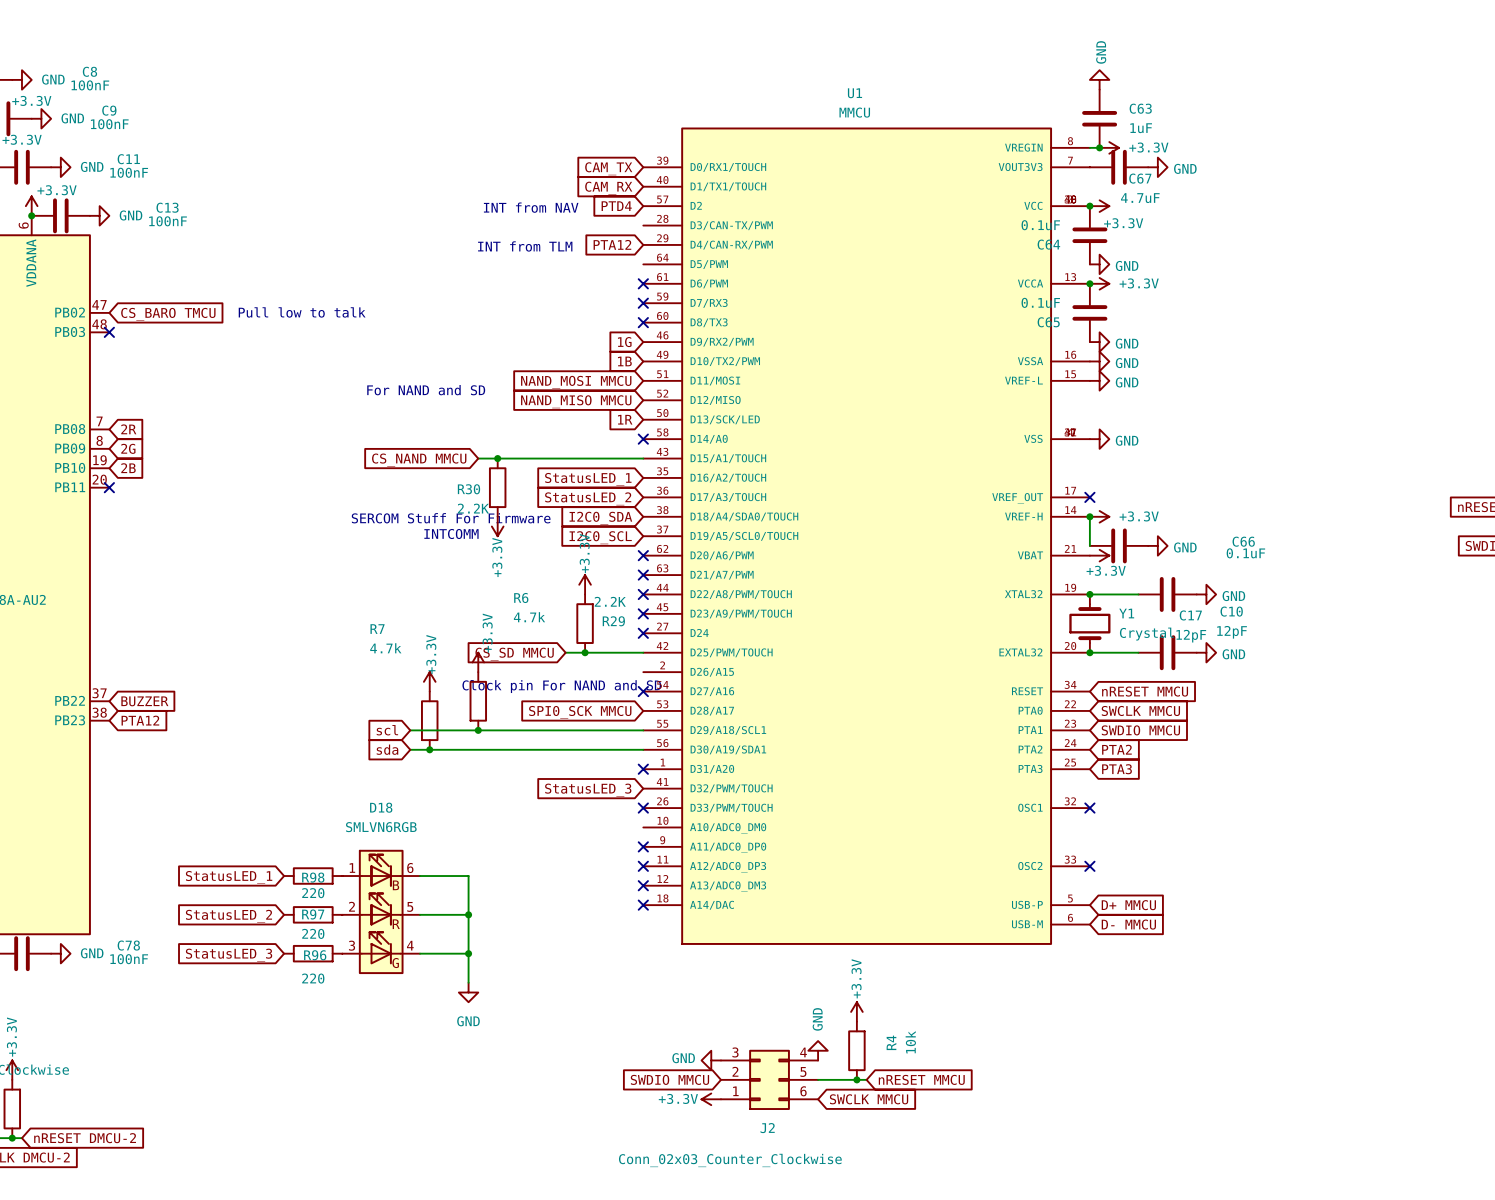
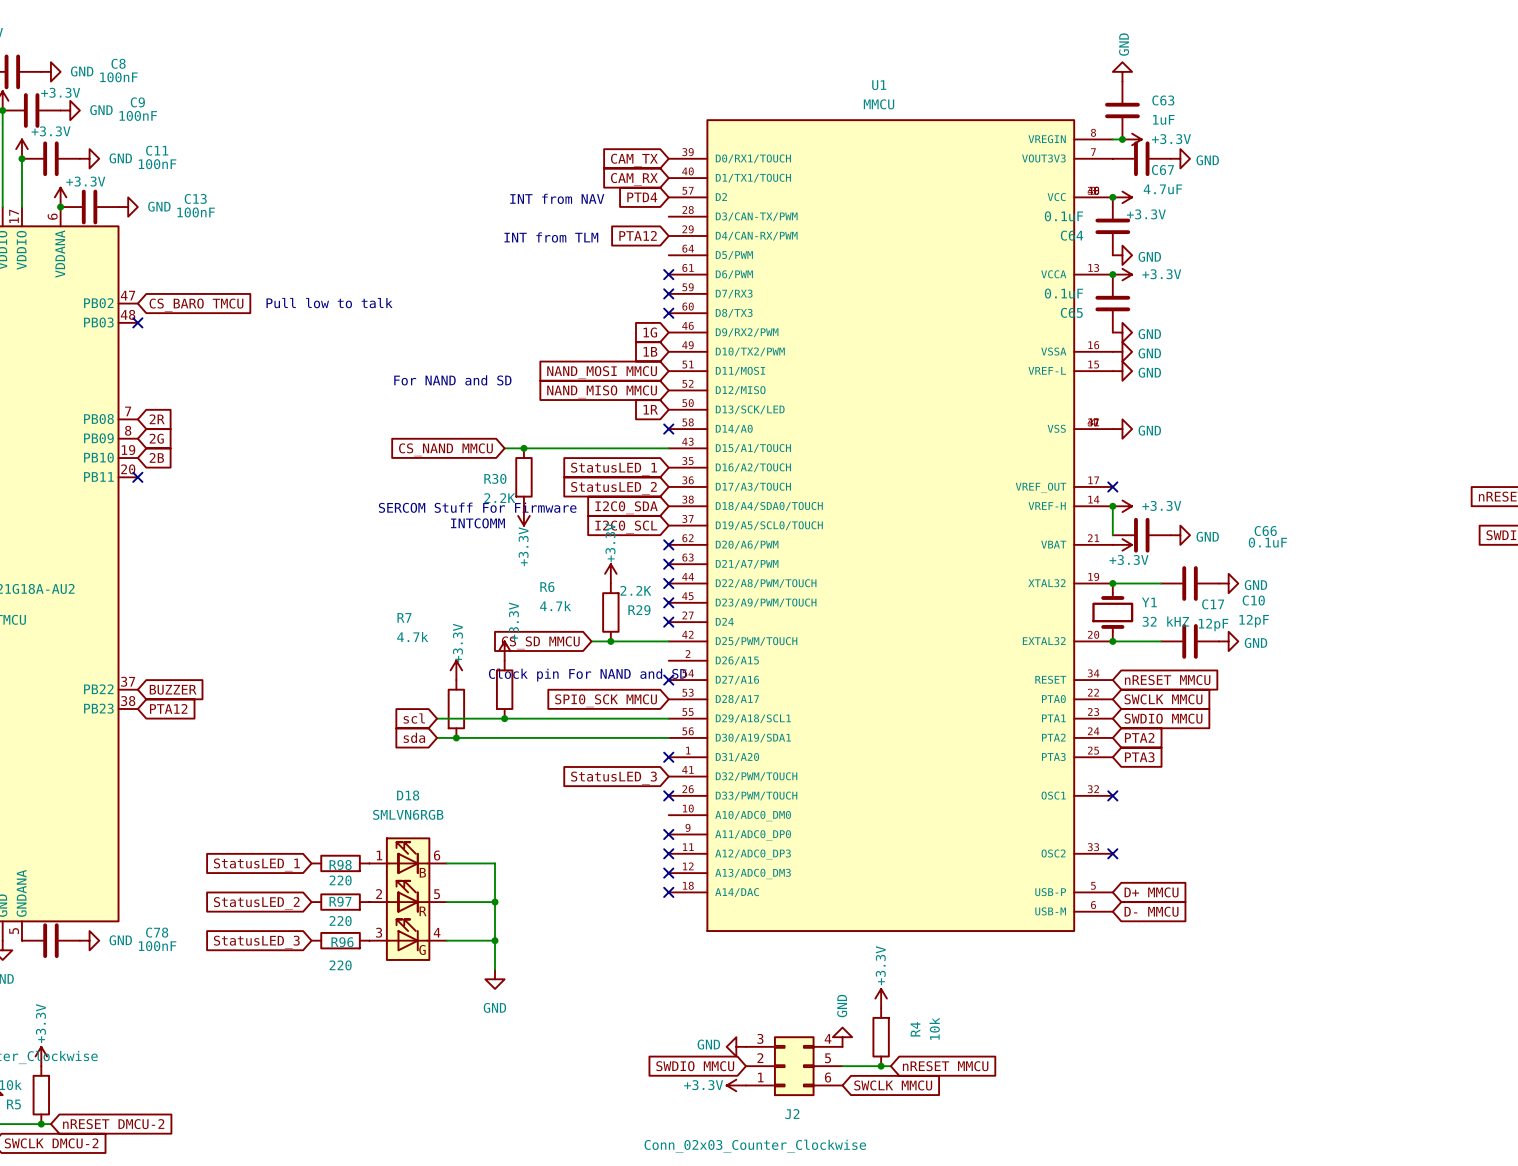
Y1 value: Crystal (1146, 634) -> 32 kHZ (1165, 621)

